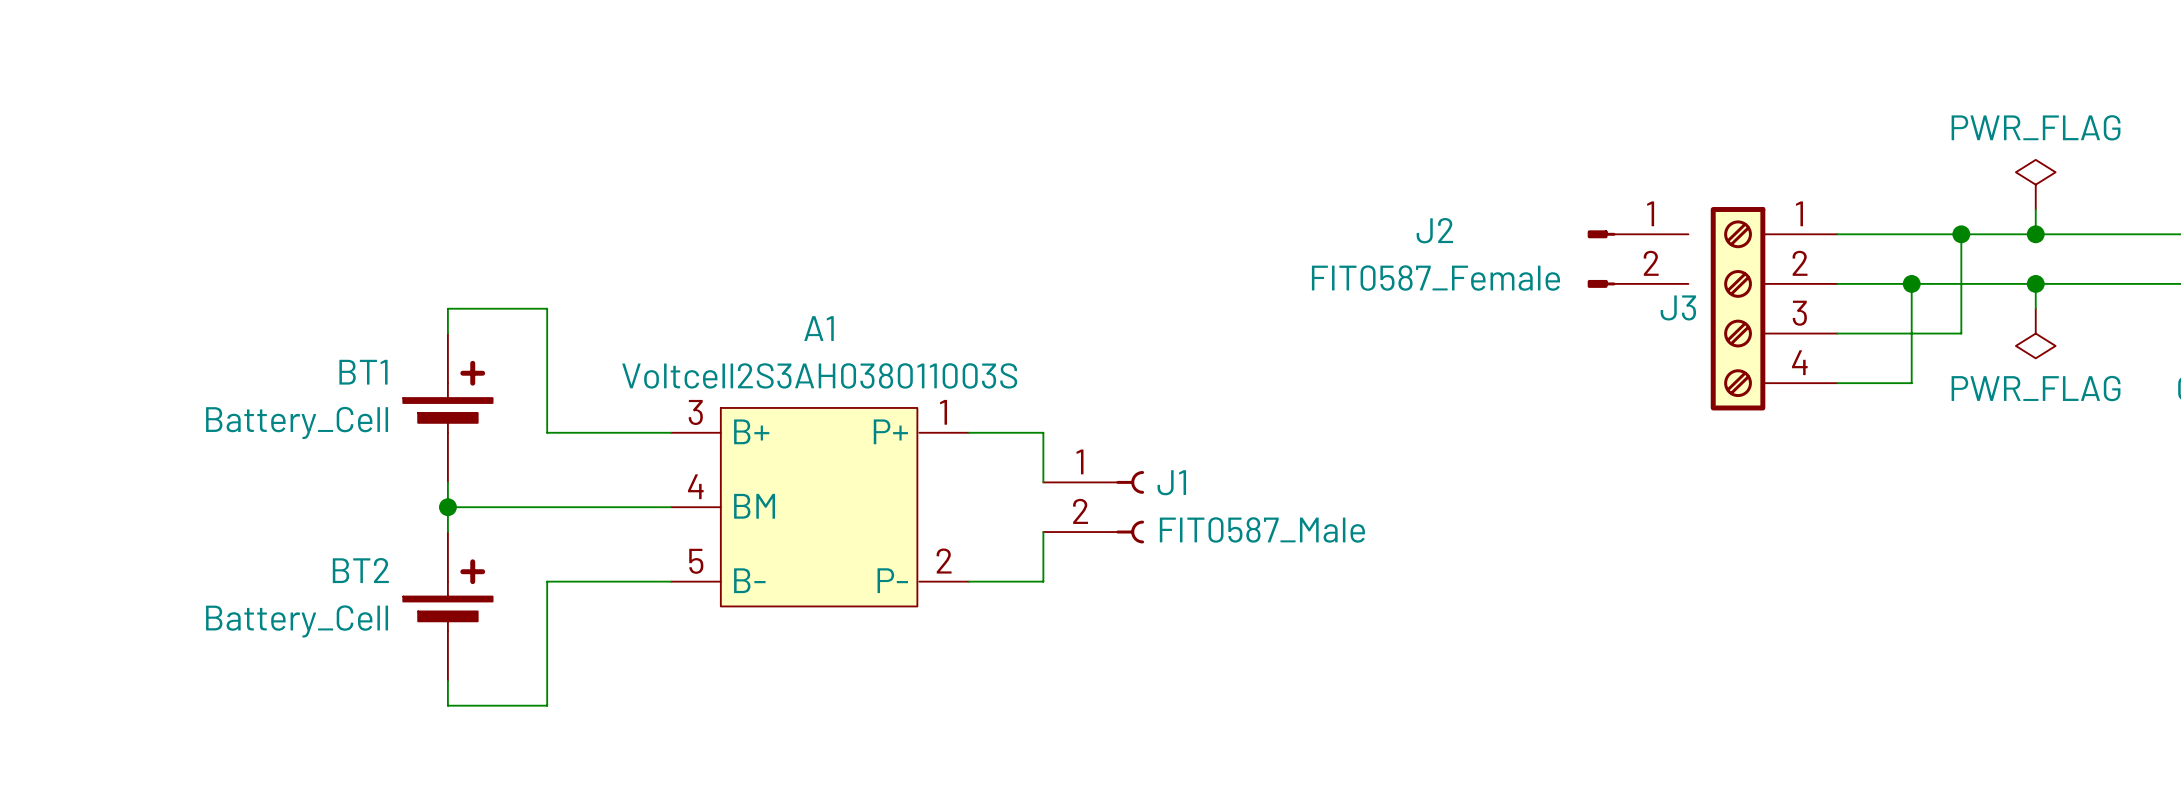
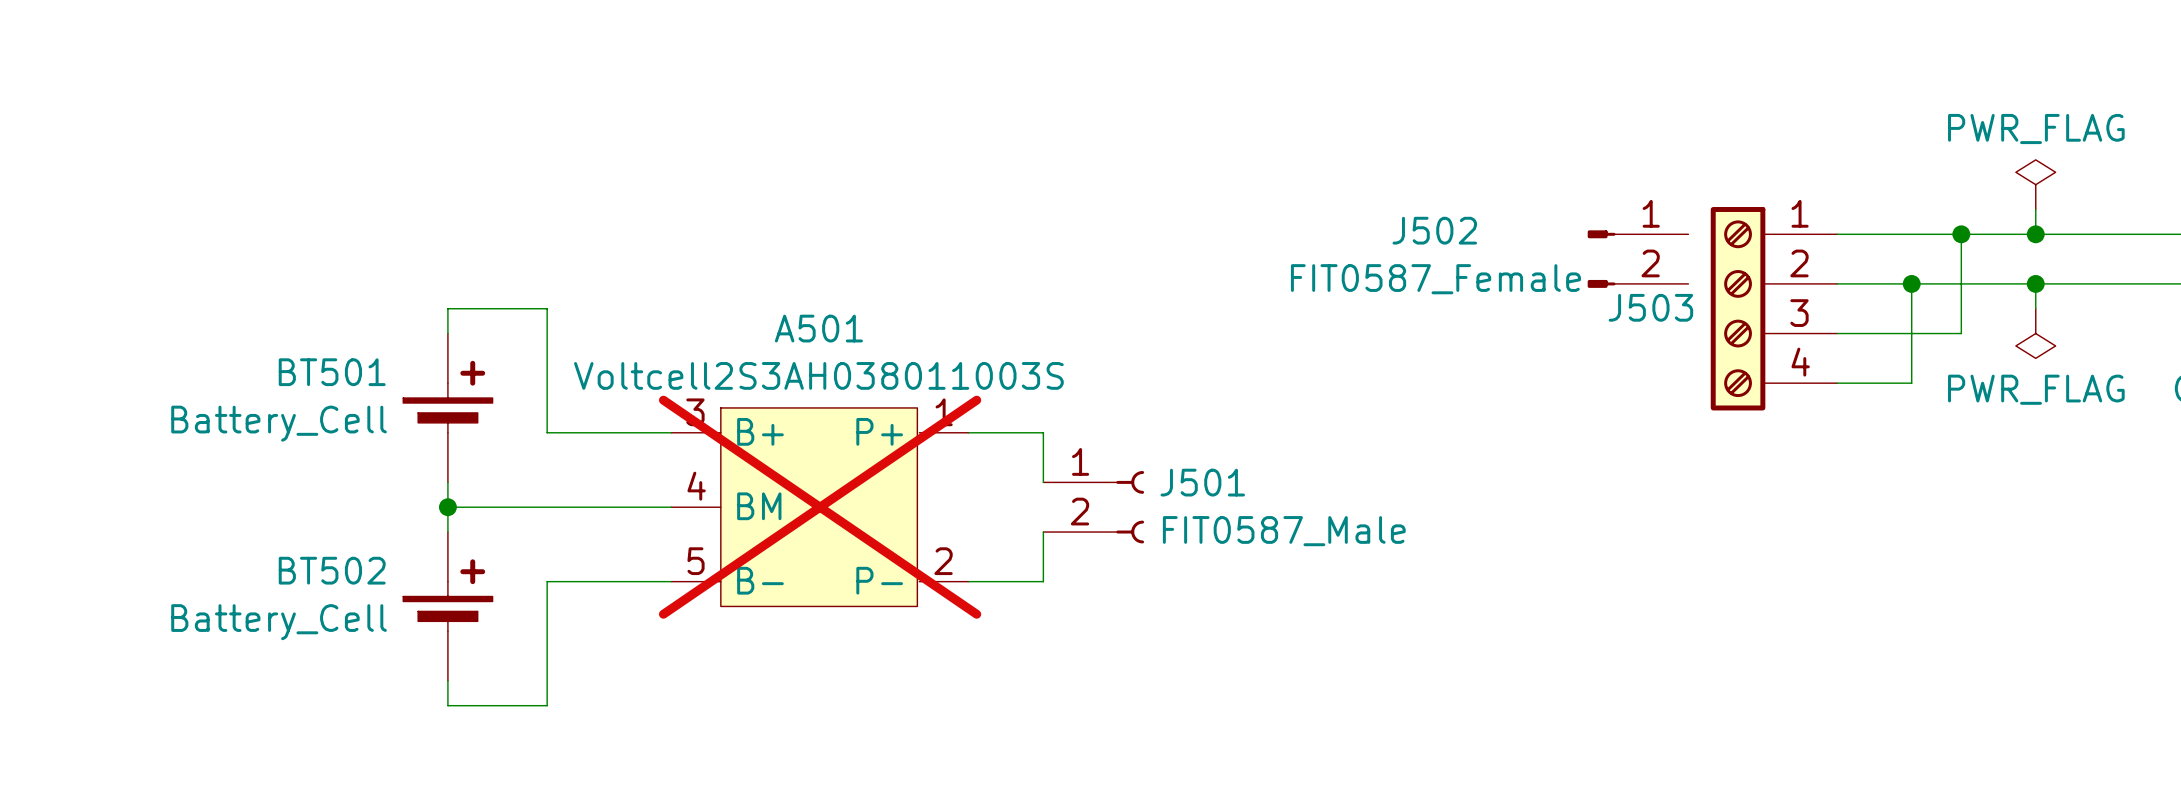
J2 name: J2 (1434, 230) -> J502 (1434, 230)
J3 name: J3 (1678, 307) -> J503 (1650, 307)
A1 name: A1 (819, 328) -> A501 (818, 328)
BT1 name: BT1 (363, 372) -> BT501 (332, 372)
J1 name: J1 (1171, 482) -> J501 (1202, 482)
A1 do-not-place cross: none -> (820, 507)
BT2 name: BT2 (360, 570) -> BT502 (332, 570)

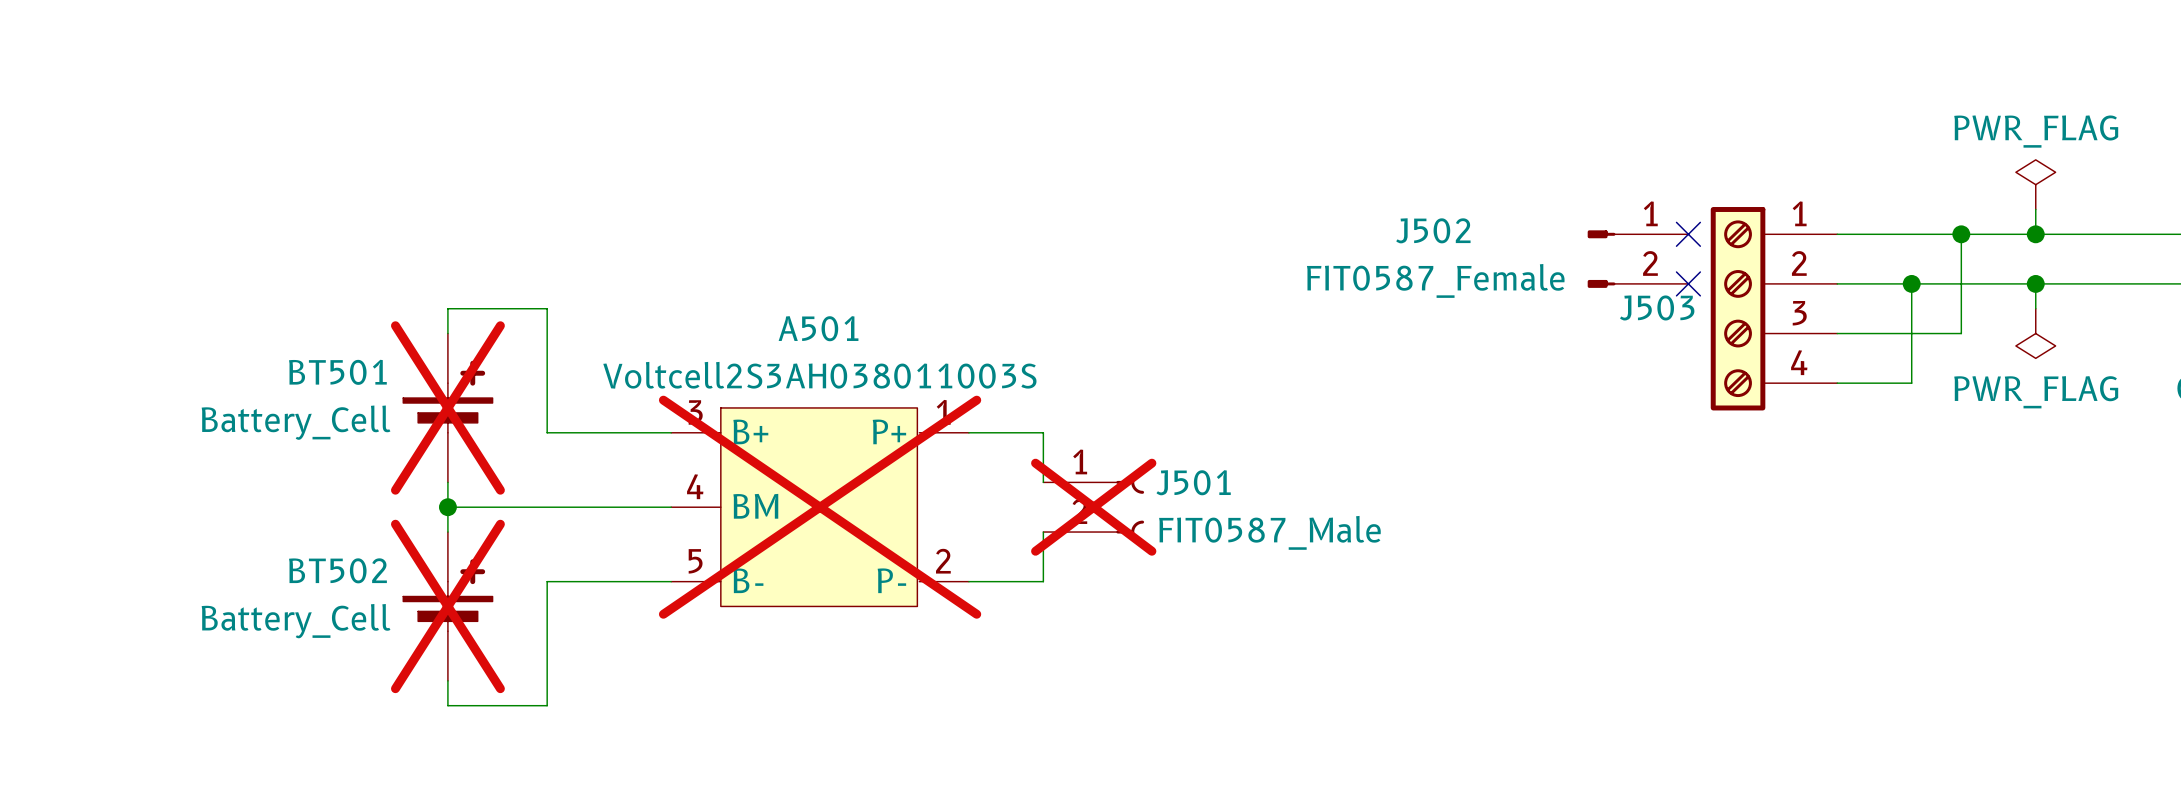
no-connect mark: none -> (1688, 234)
no-connect mark: none -> (1688, 283)
BT501 do-not-place cross: none -> (447, 407)
J501 do-not-place cross: none -> (1093, 507)
BT502 do-not-place cross: none -> (447, 606)

